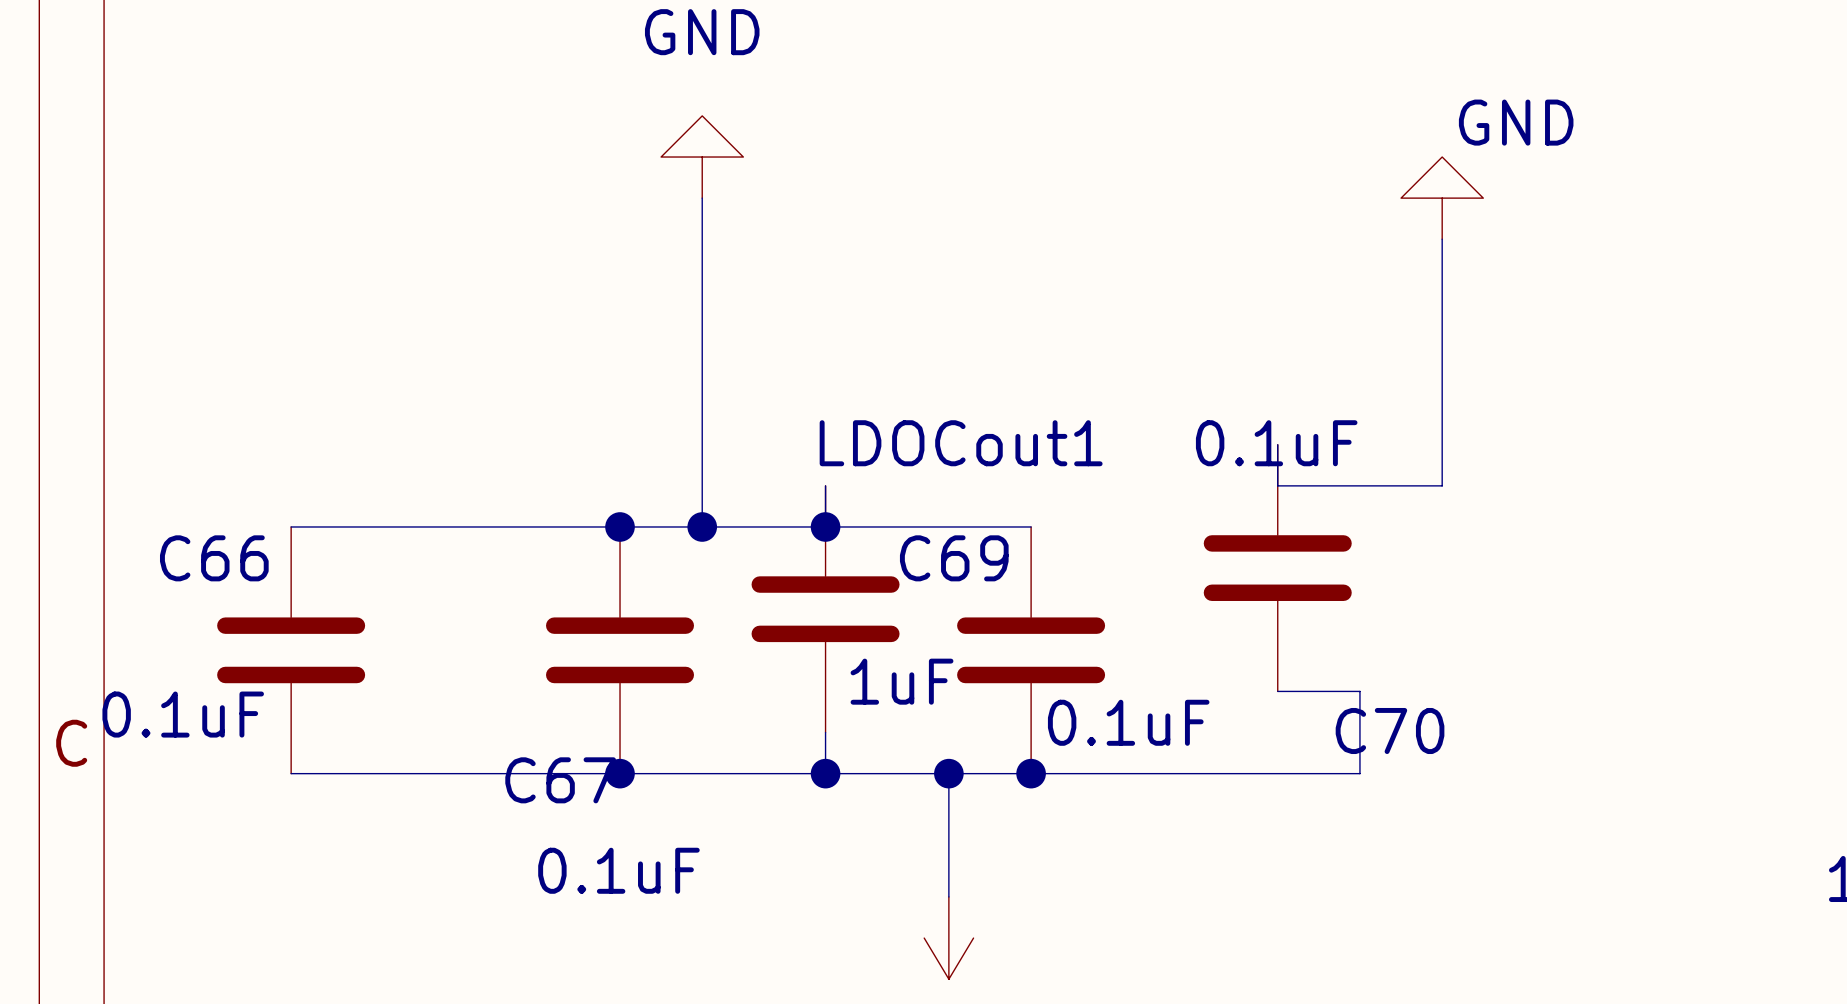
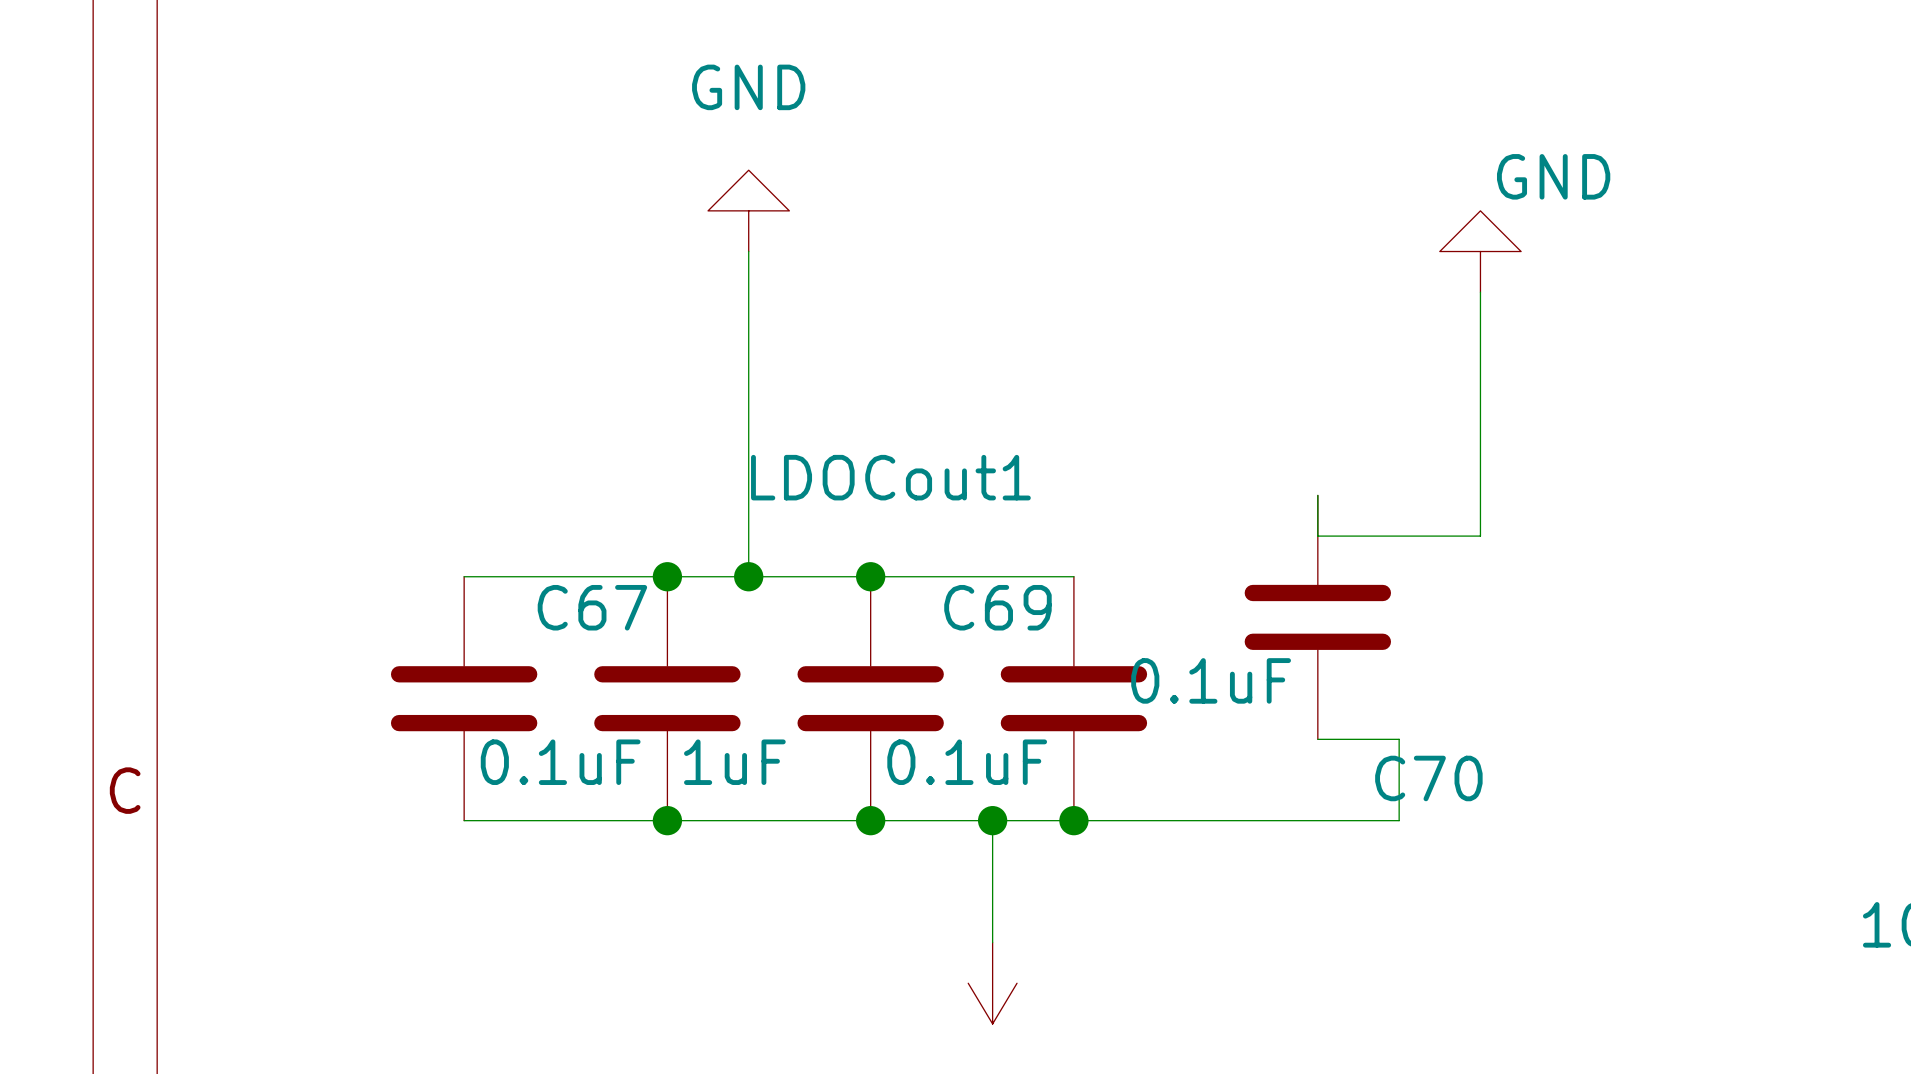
LDOCout1 name position: LDOCout1 (961, 443) -> LDOCout1 (890, 477)
C70 value position: 0.1uF (1276, 443) -> 0.1uF (1211, 680)
wire: (825, 485) (825, 526) -> none
wire: (291, 526) (414, 526) -> none
LDOCout1 position: (825, 609) -> (870, 698)
C66: 0.1uF (291, 650) -> none
part: none -> (464, 698)
LDOCout1 value position: 1uF (902, 681) -> 1uF (734, 762)
C69 value position: 0.1uF (1128, 722) -> 0.1uF (967, 762)
wire: (291, 773) (414, 773) -> none
C67 name position: C67 (560, 780) -> C67 (592, 607)
C67 value position: 0.1uF (618, 870) -> 0.1uF (560, 762)

